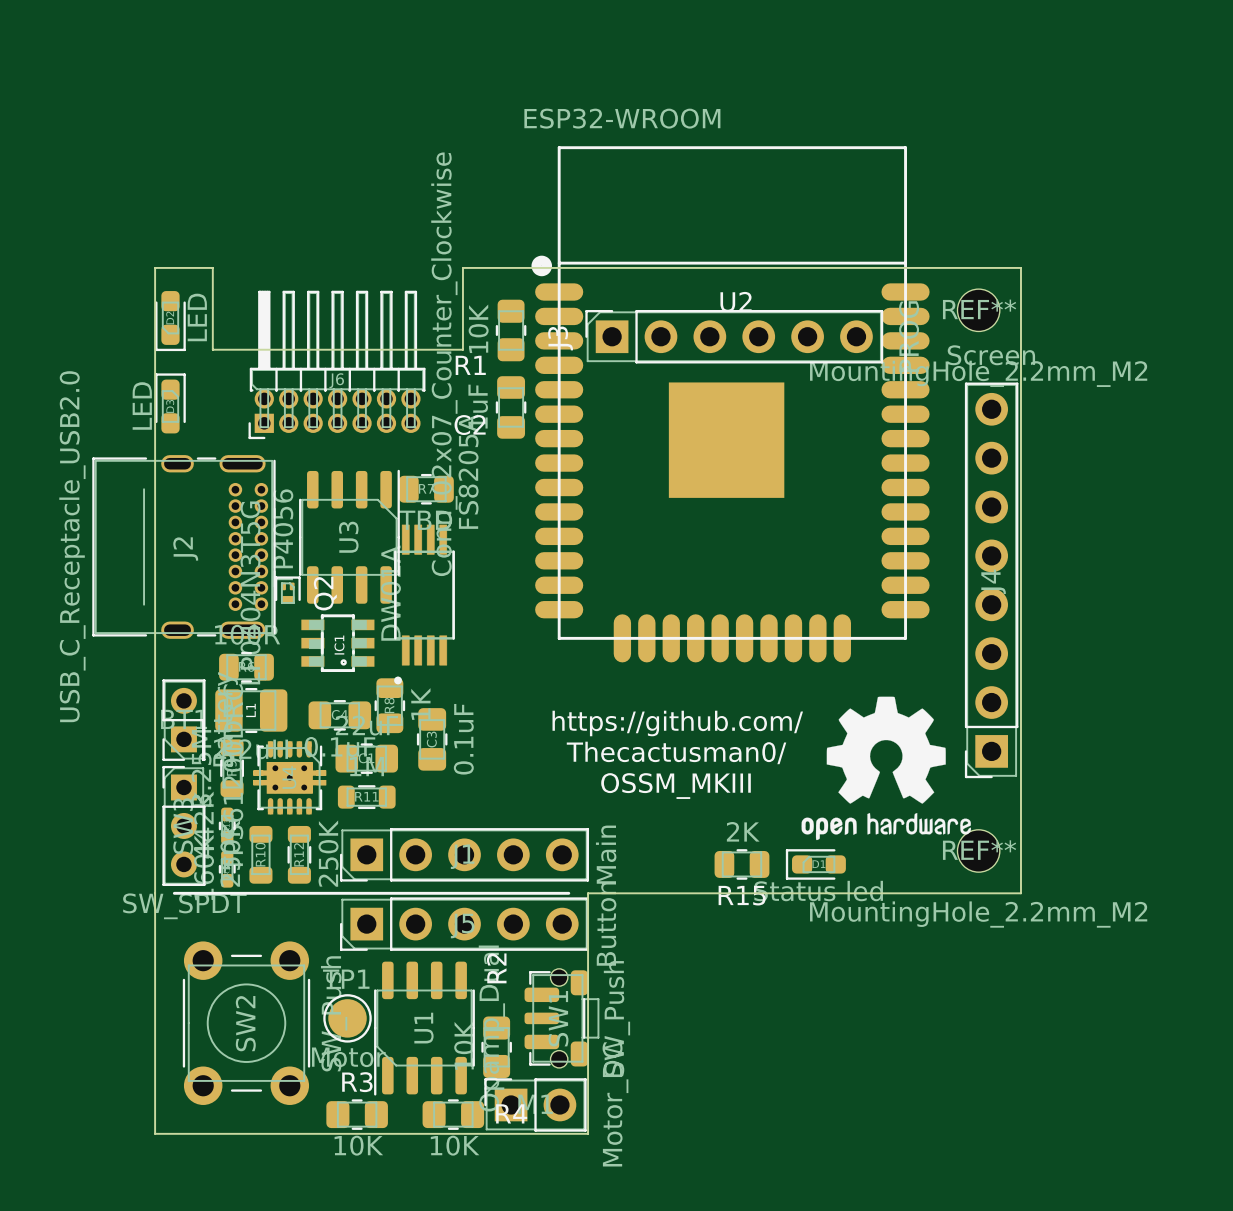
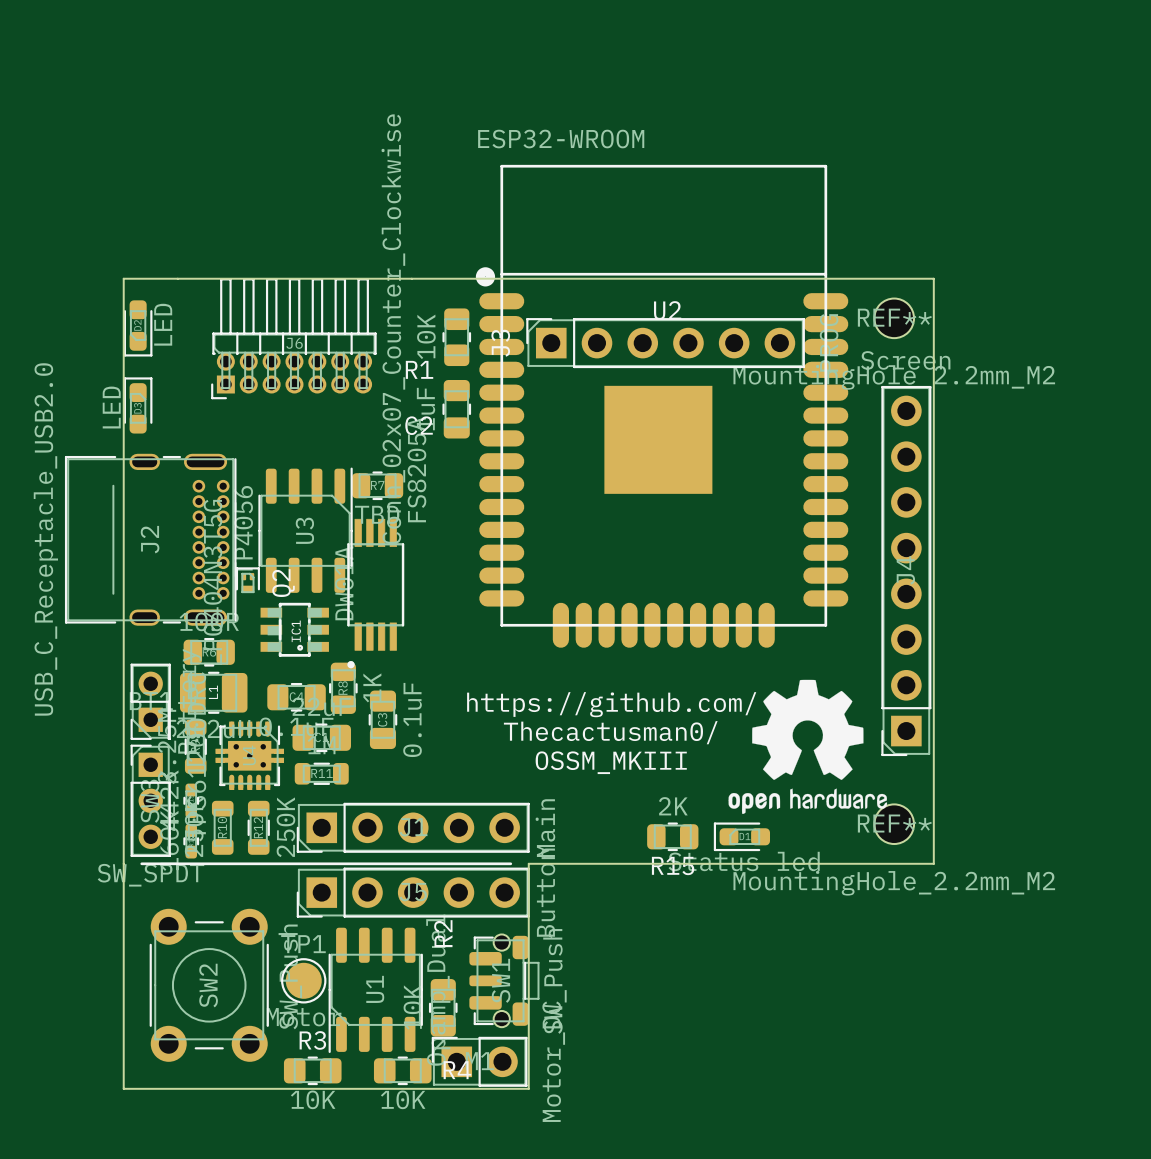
board edge: (212, 267) (212, 349) (462, 349) (462, 267) -> (177, 278) (411, 278)
J6 footprint: [248, 290, 426, 440] -> [211, 278, 377, 400]

